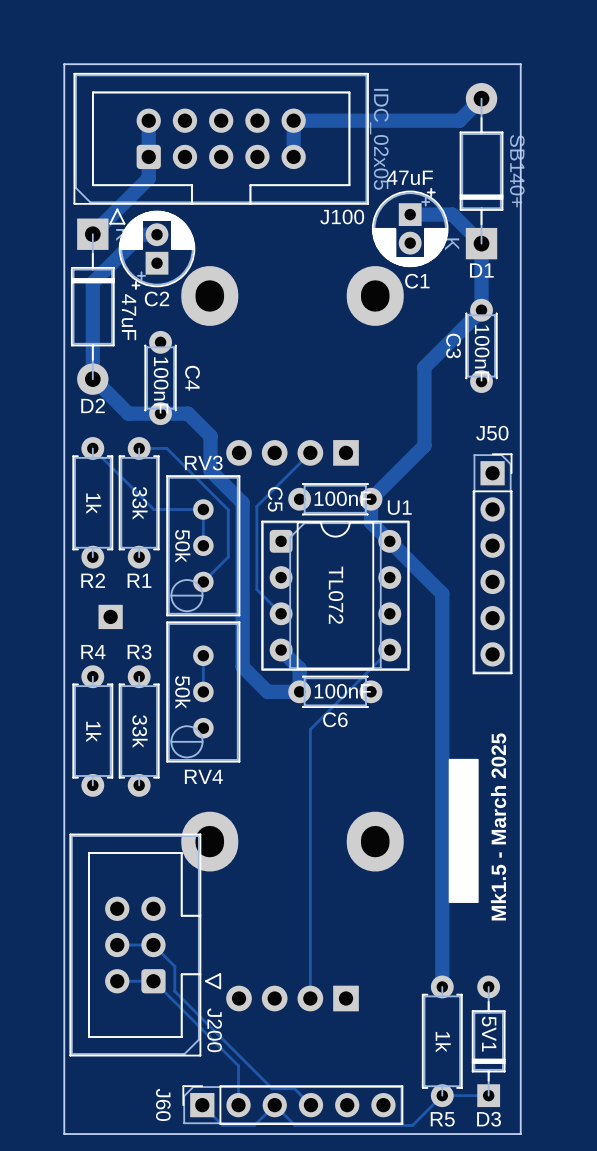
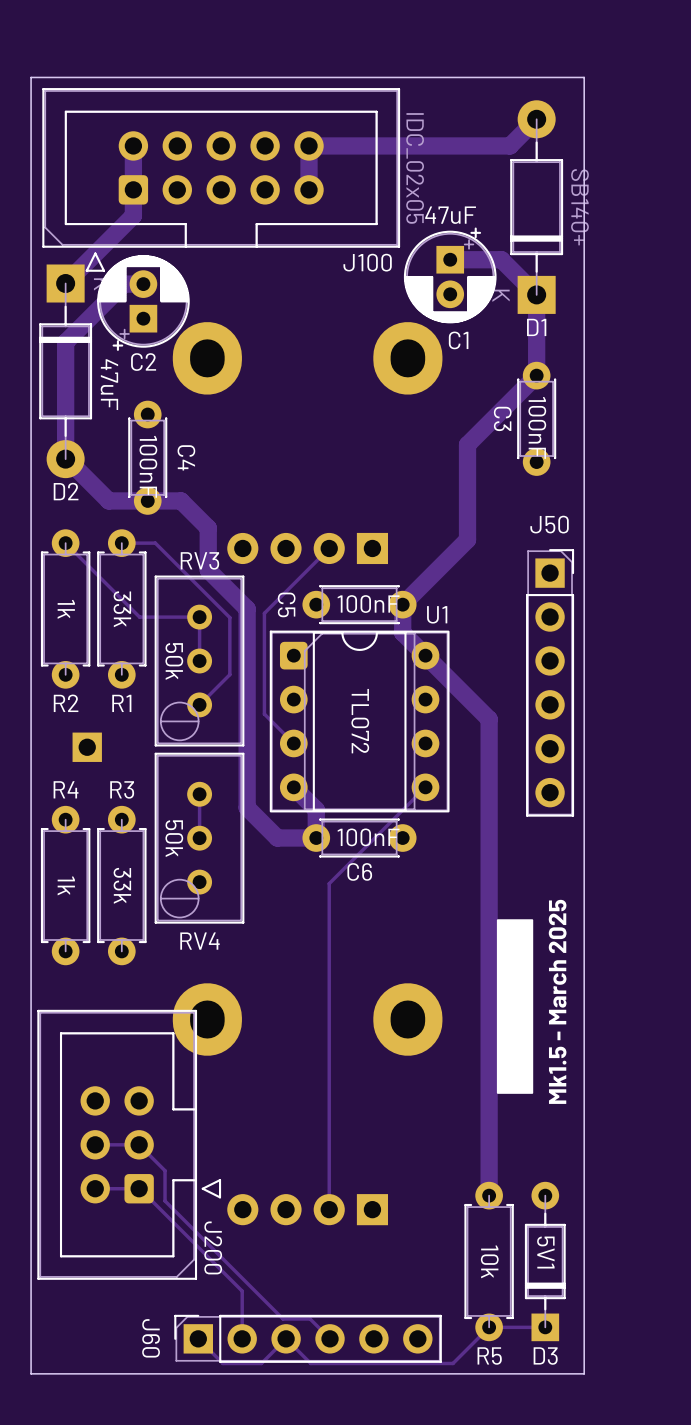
R5 value: 1k (443, 1042) -> 10k (489, 1261)

